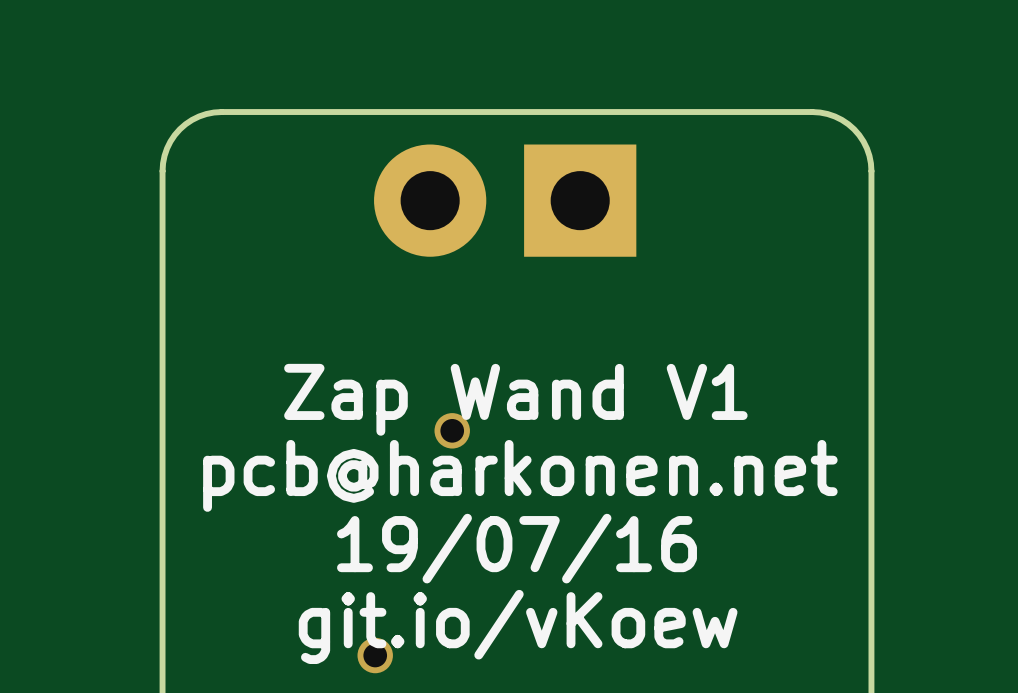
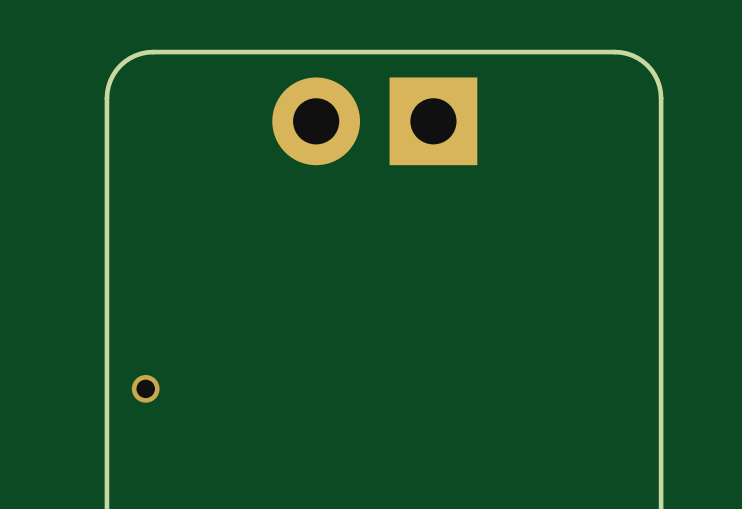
text: Zap Wand V1 (515, 399) -> none
via: (452, 430) -> none
text: pcb@harkonen.net (520, 475) -> none
via: none -> (145, 388)
text: 19/07/16 (517, 548) -> none
text: git.io/vKoew (518, 626) -> none
via: (375, 655) -> none

